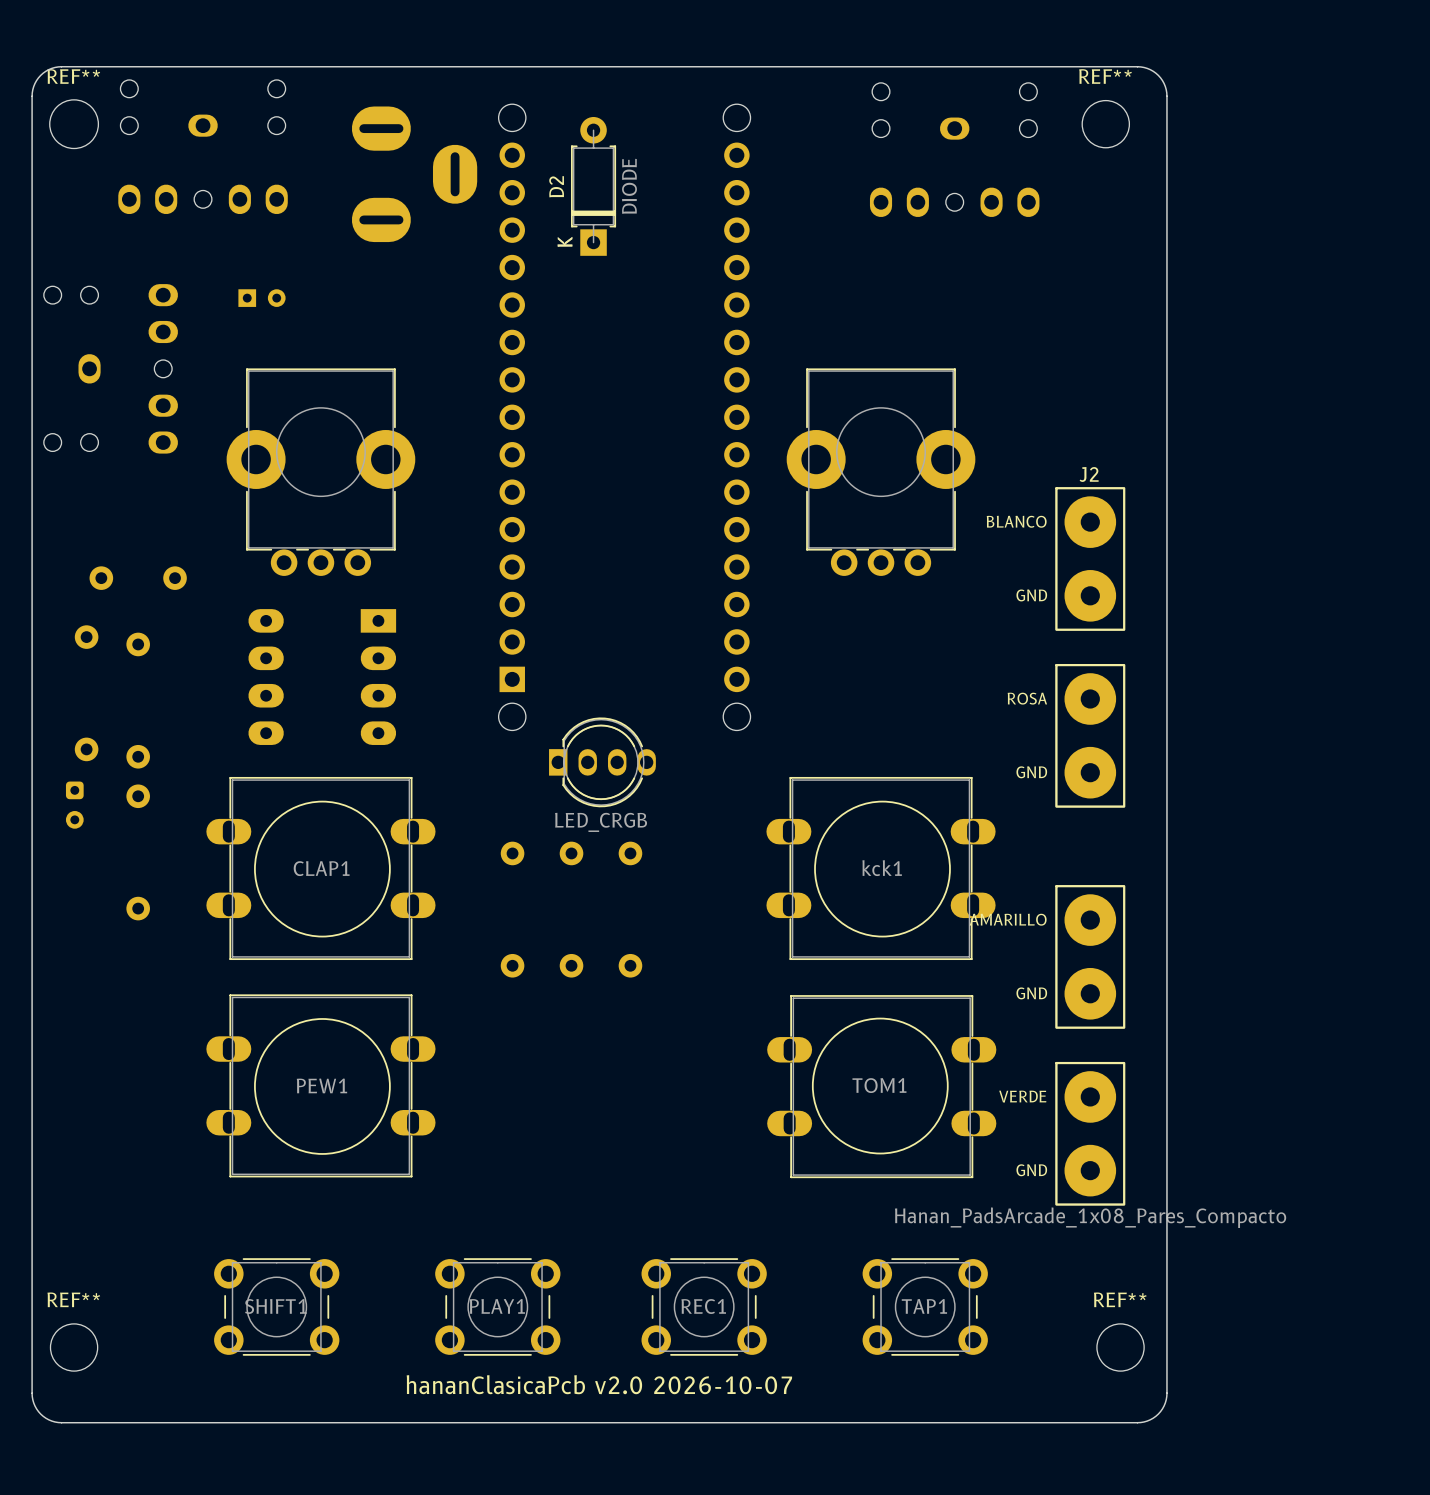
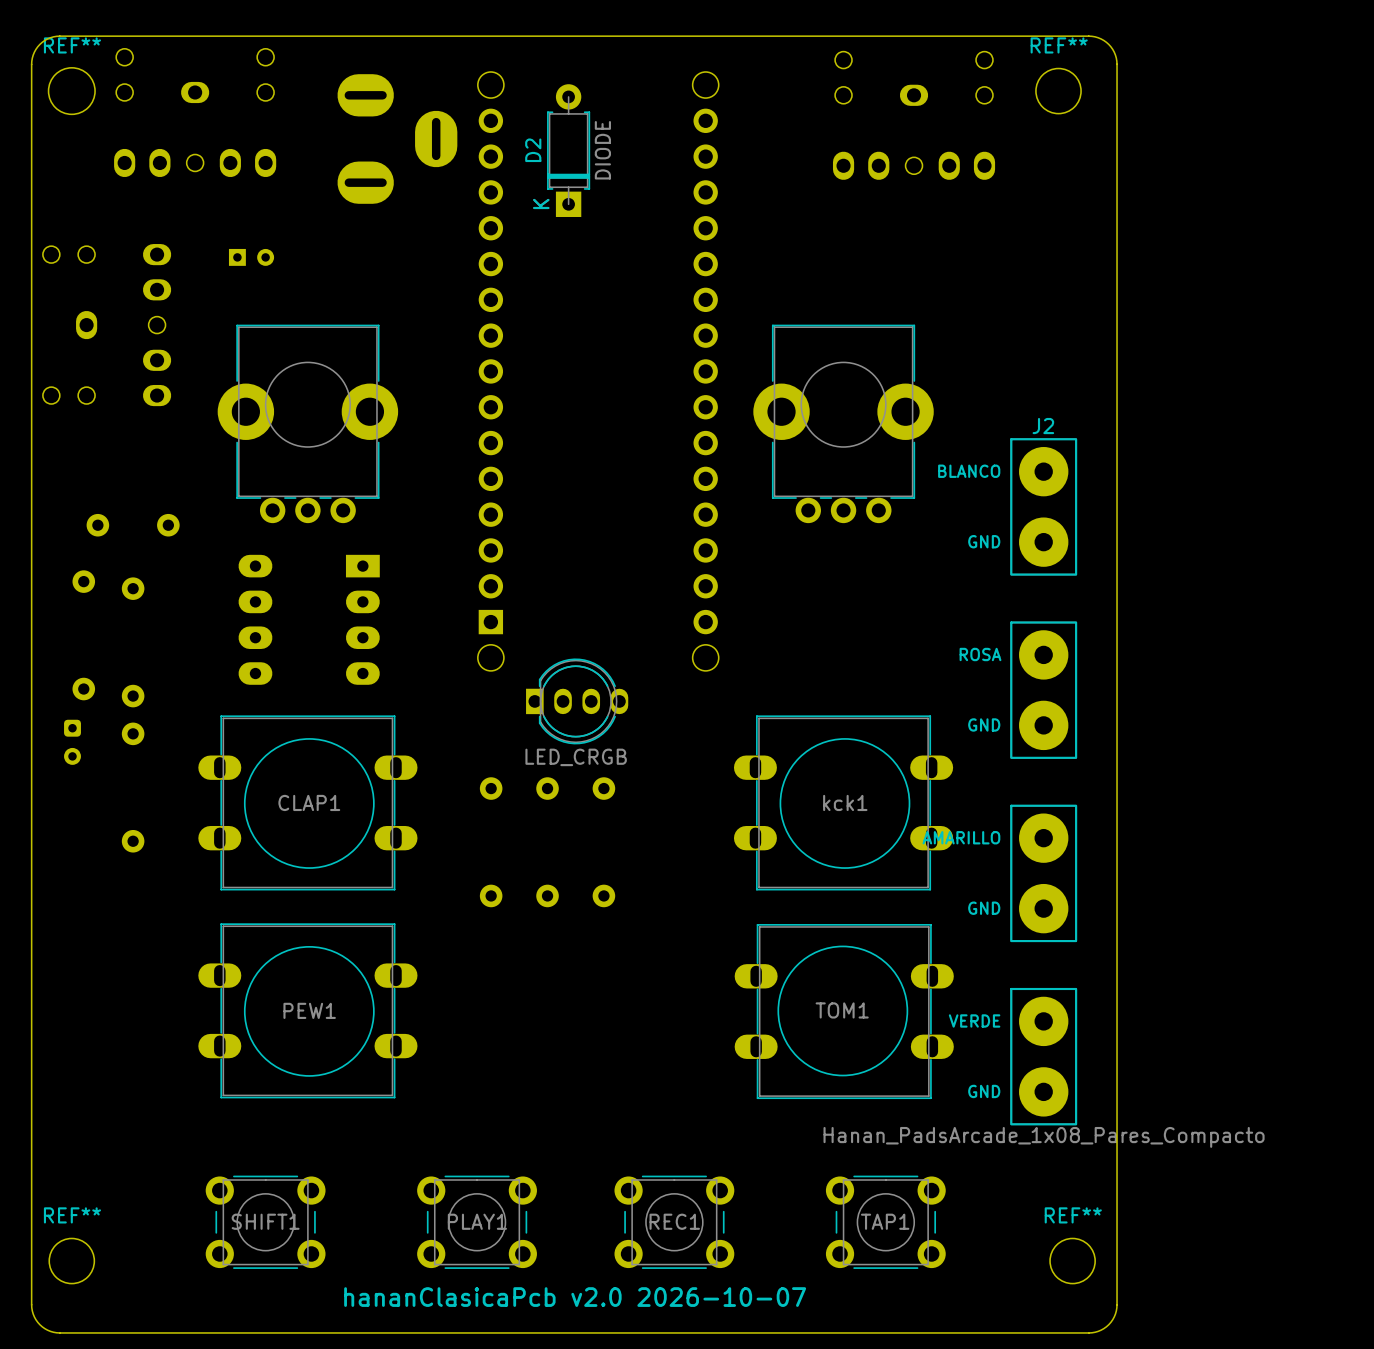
J2 footprint: [1055, 487, 1126, 1206] -> [1010, 438, 1078, 1126]

